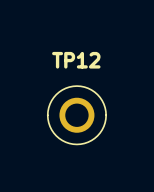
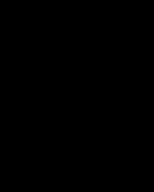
TP12: (76, 115) -> none

